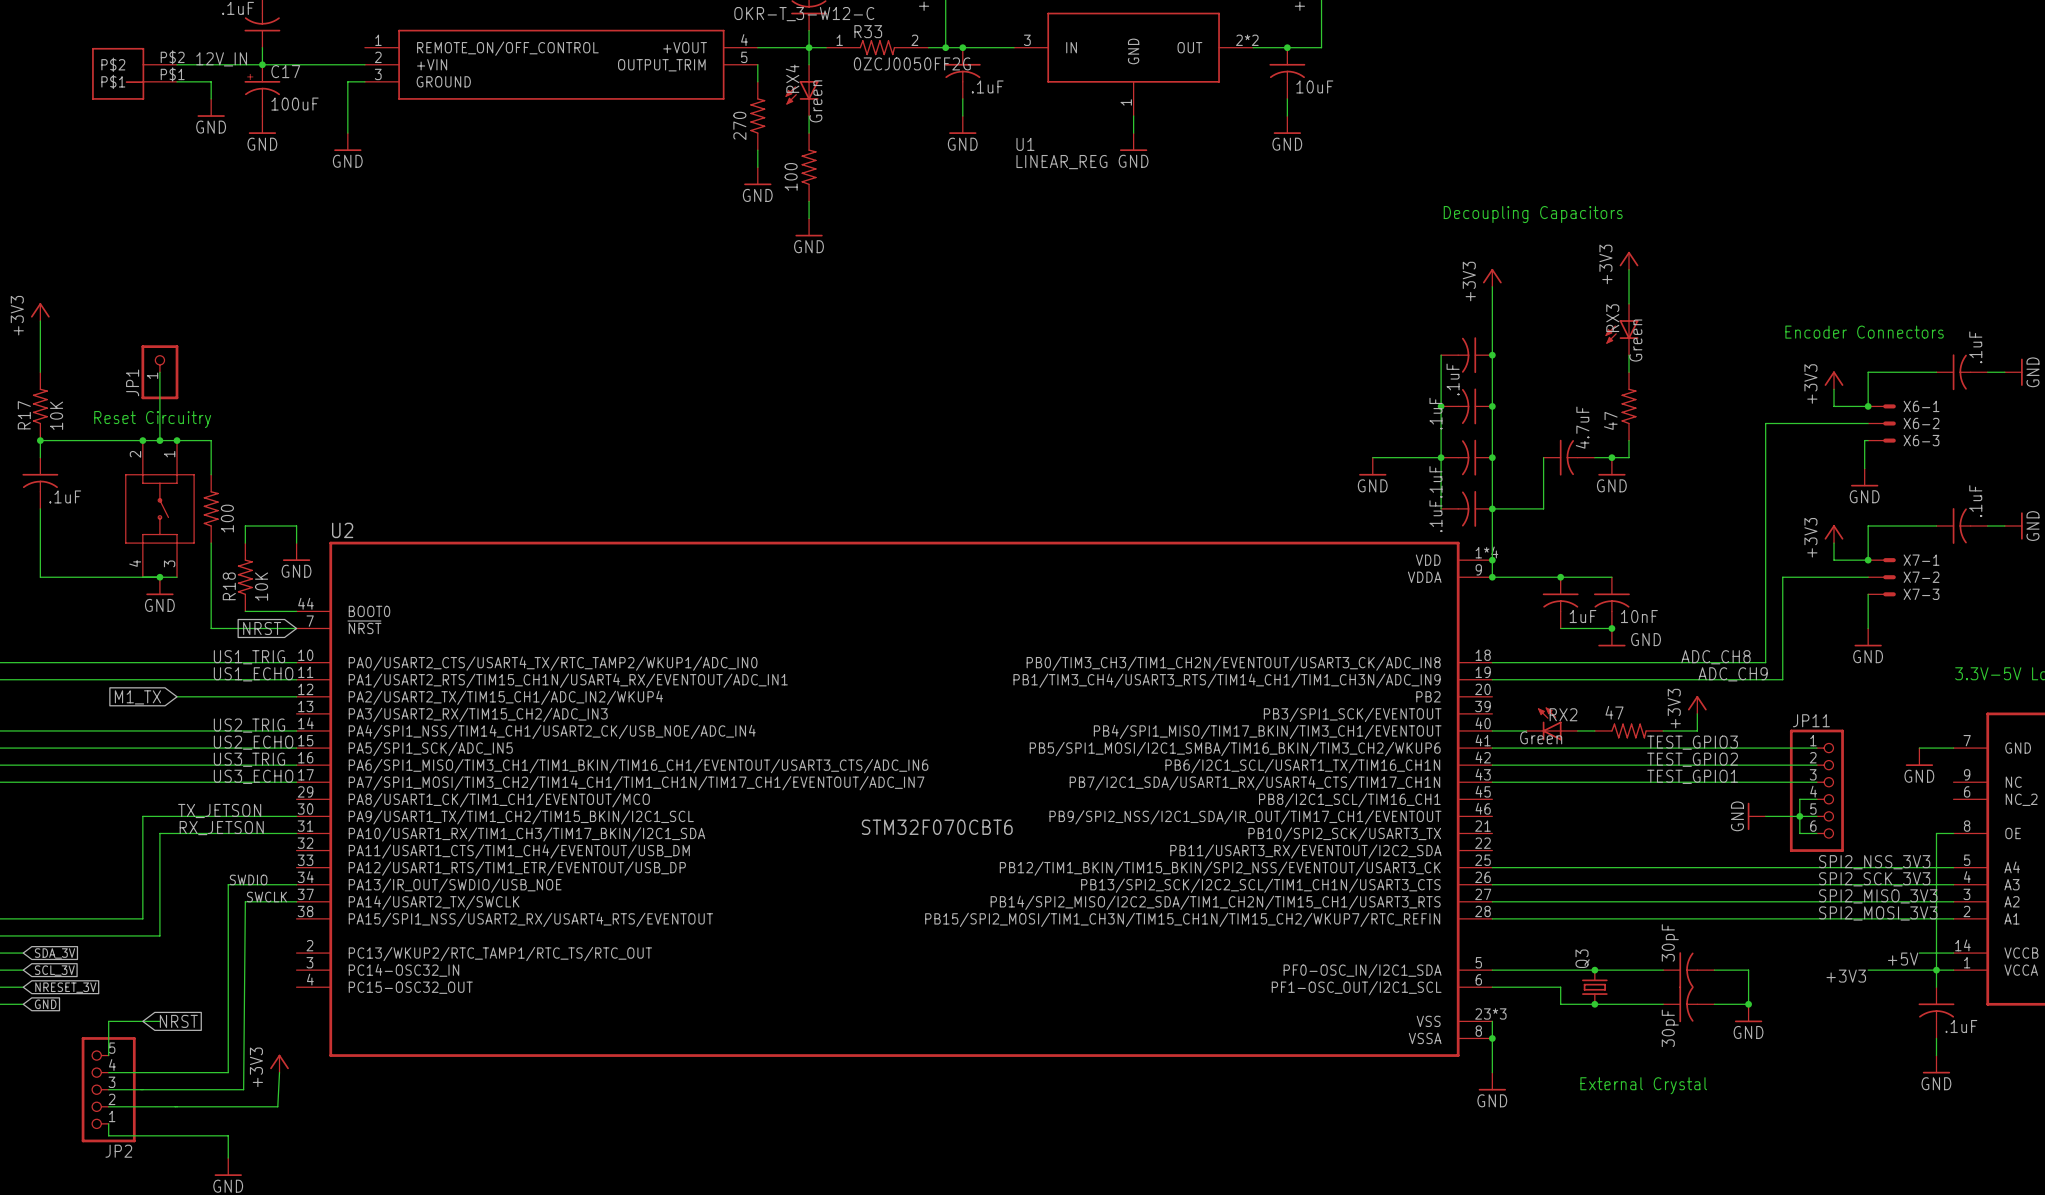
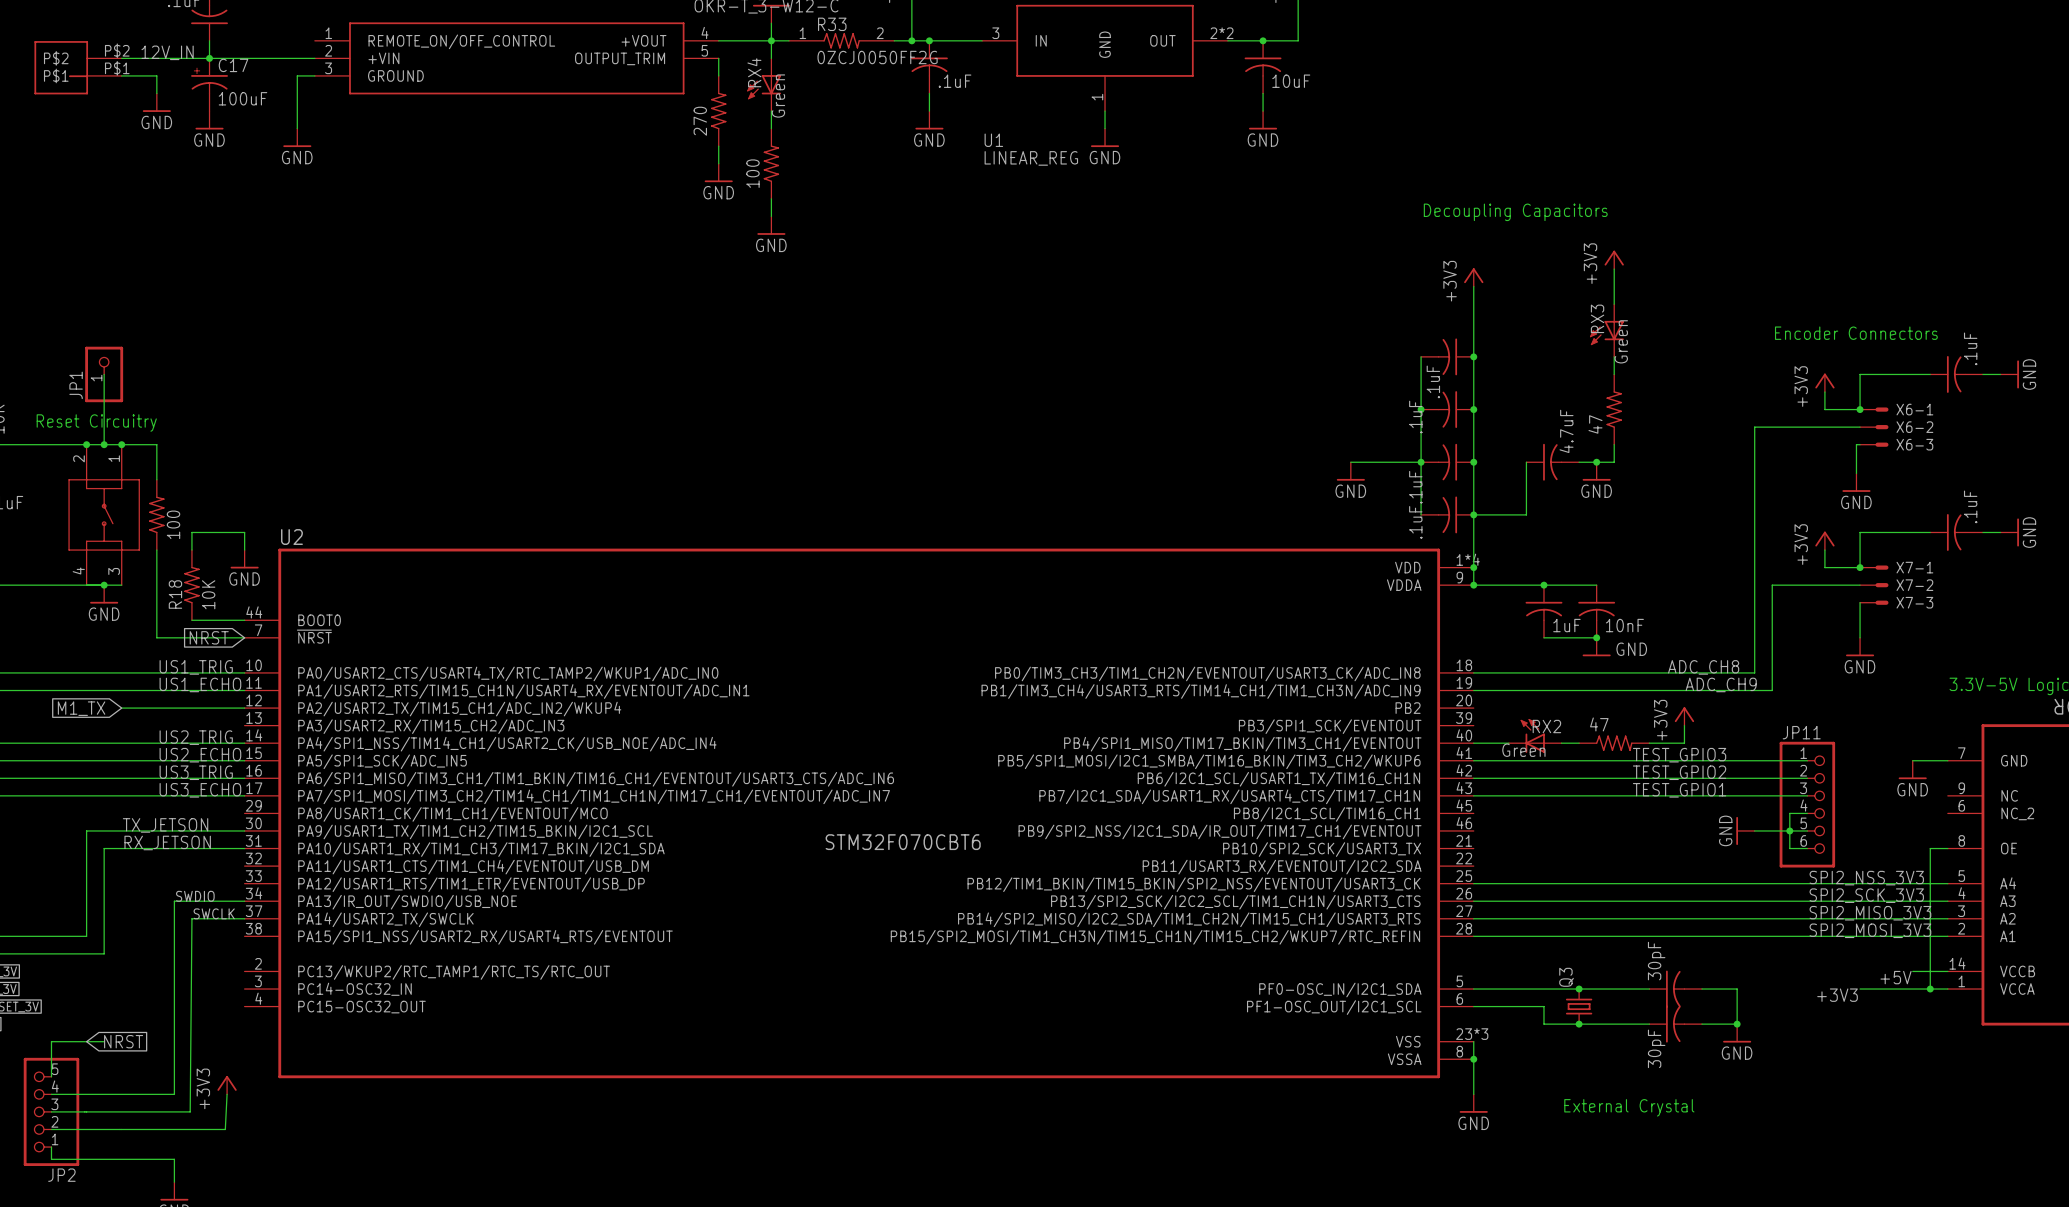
wire: (1936, 970) (1936, 987) -> none
part: .1uF (1936, 1012) -> none
wire: (1936, 1038) (1936, 1055) -> none
power symbol: GND (1936, 1064) -> none

